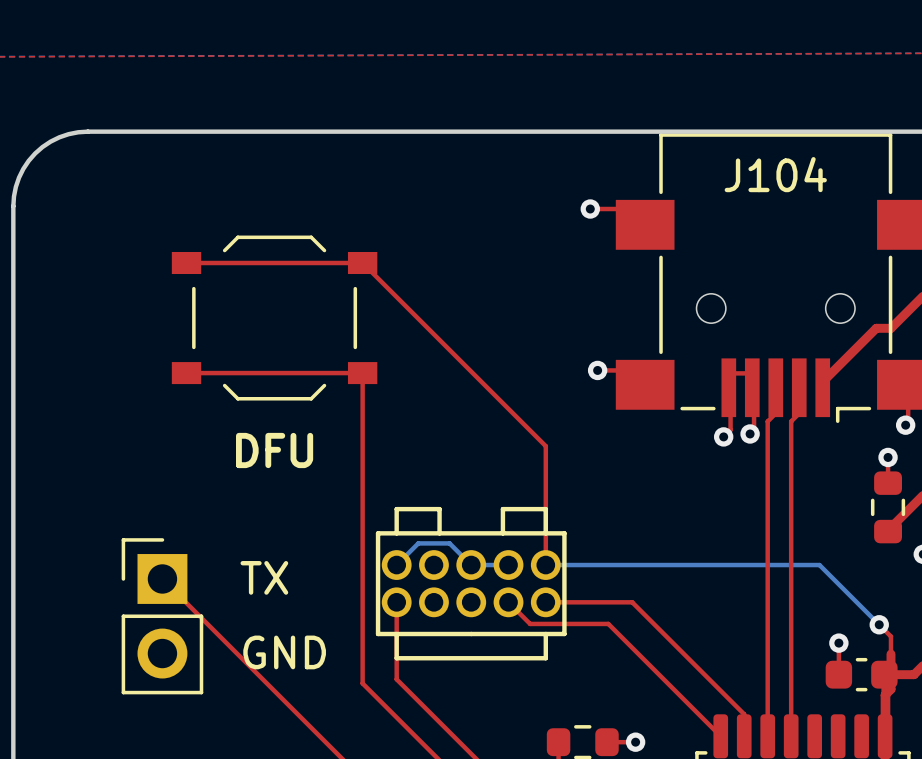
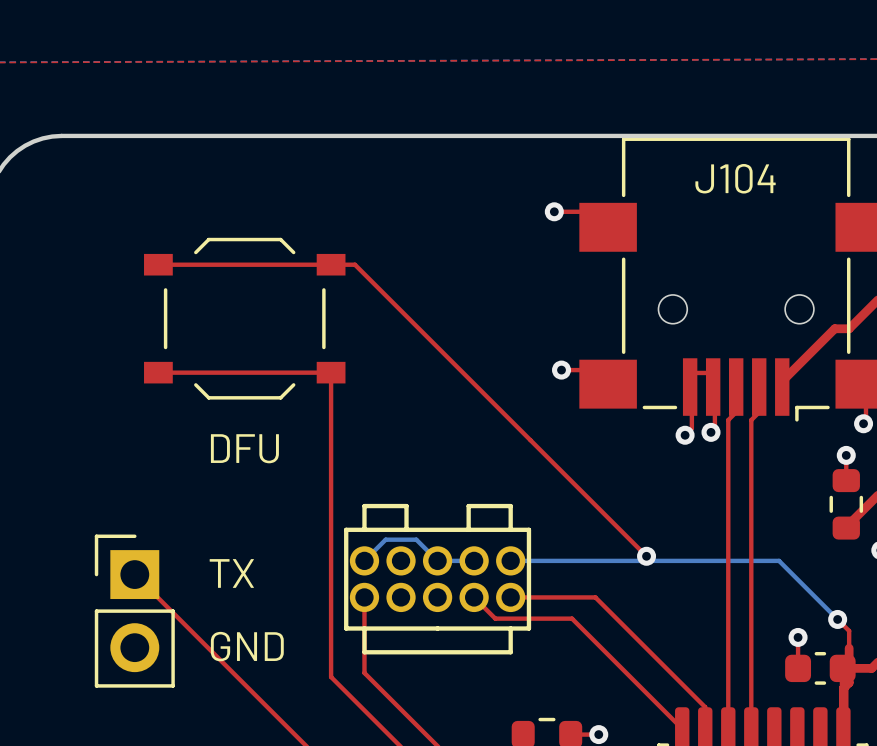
top track: (362, 263) (545, 446) (545, 565) -> (331, 264) (354, 264) (646, 556)
via: none -> (646, 556)

